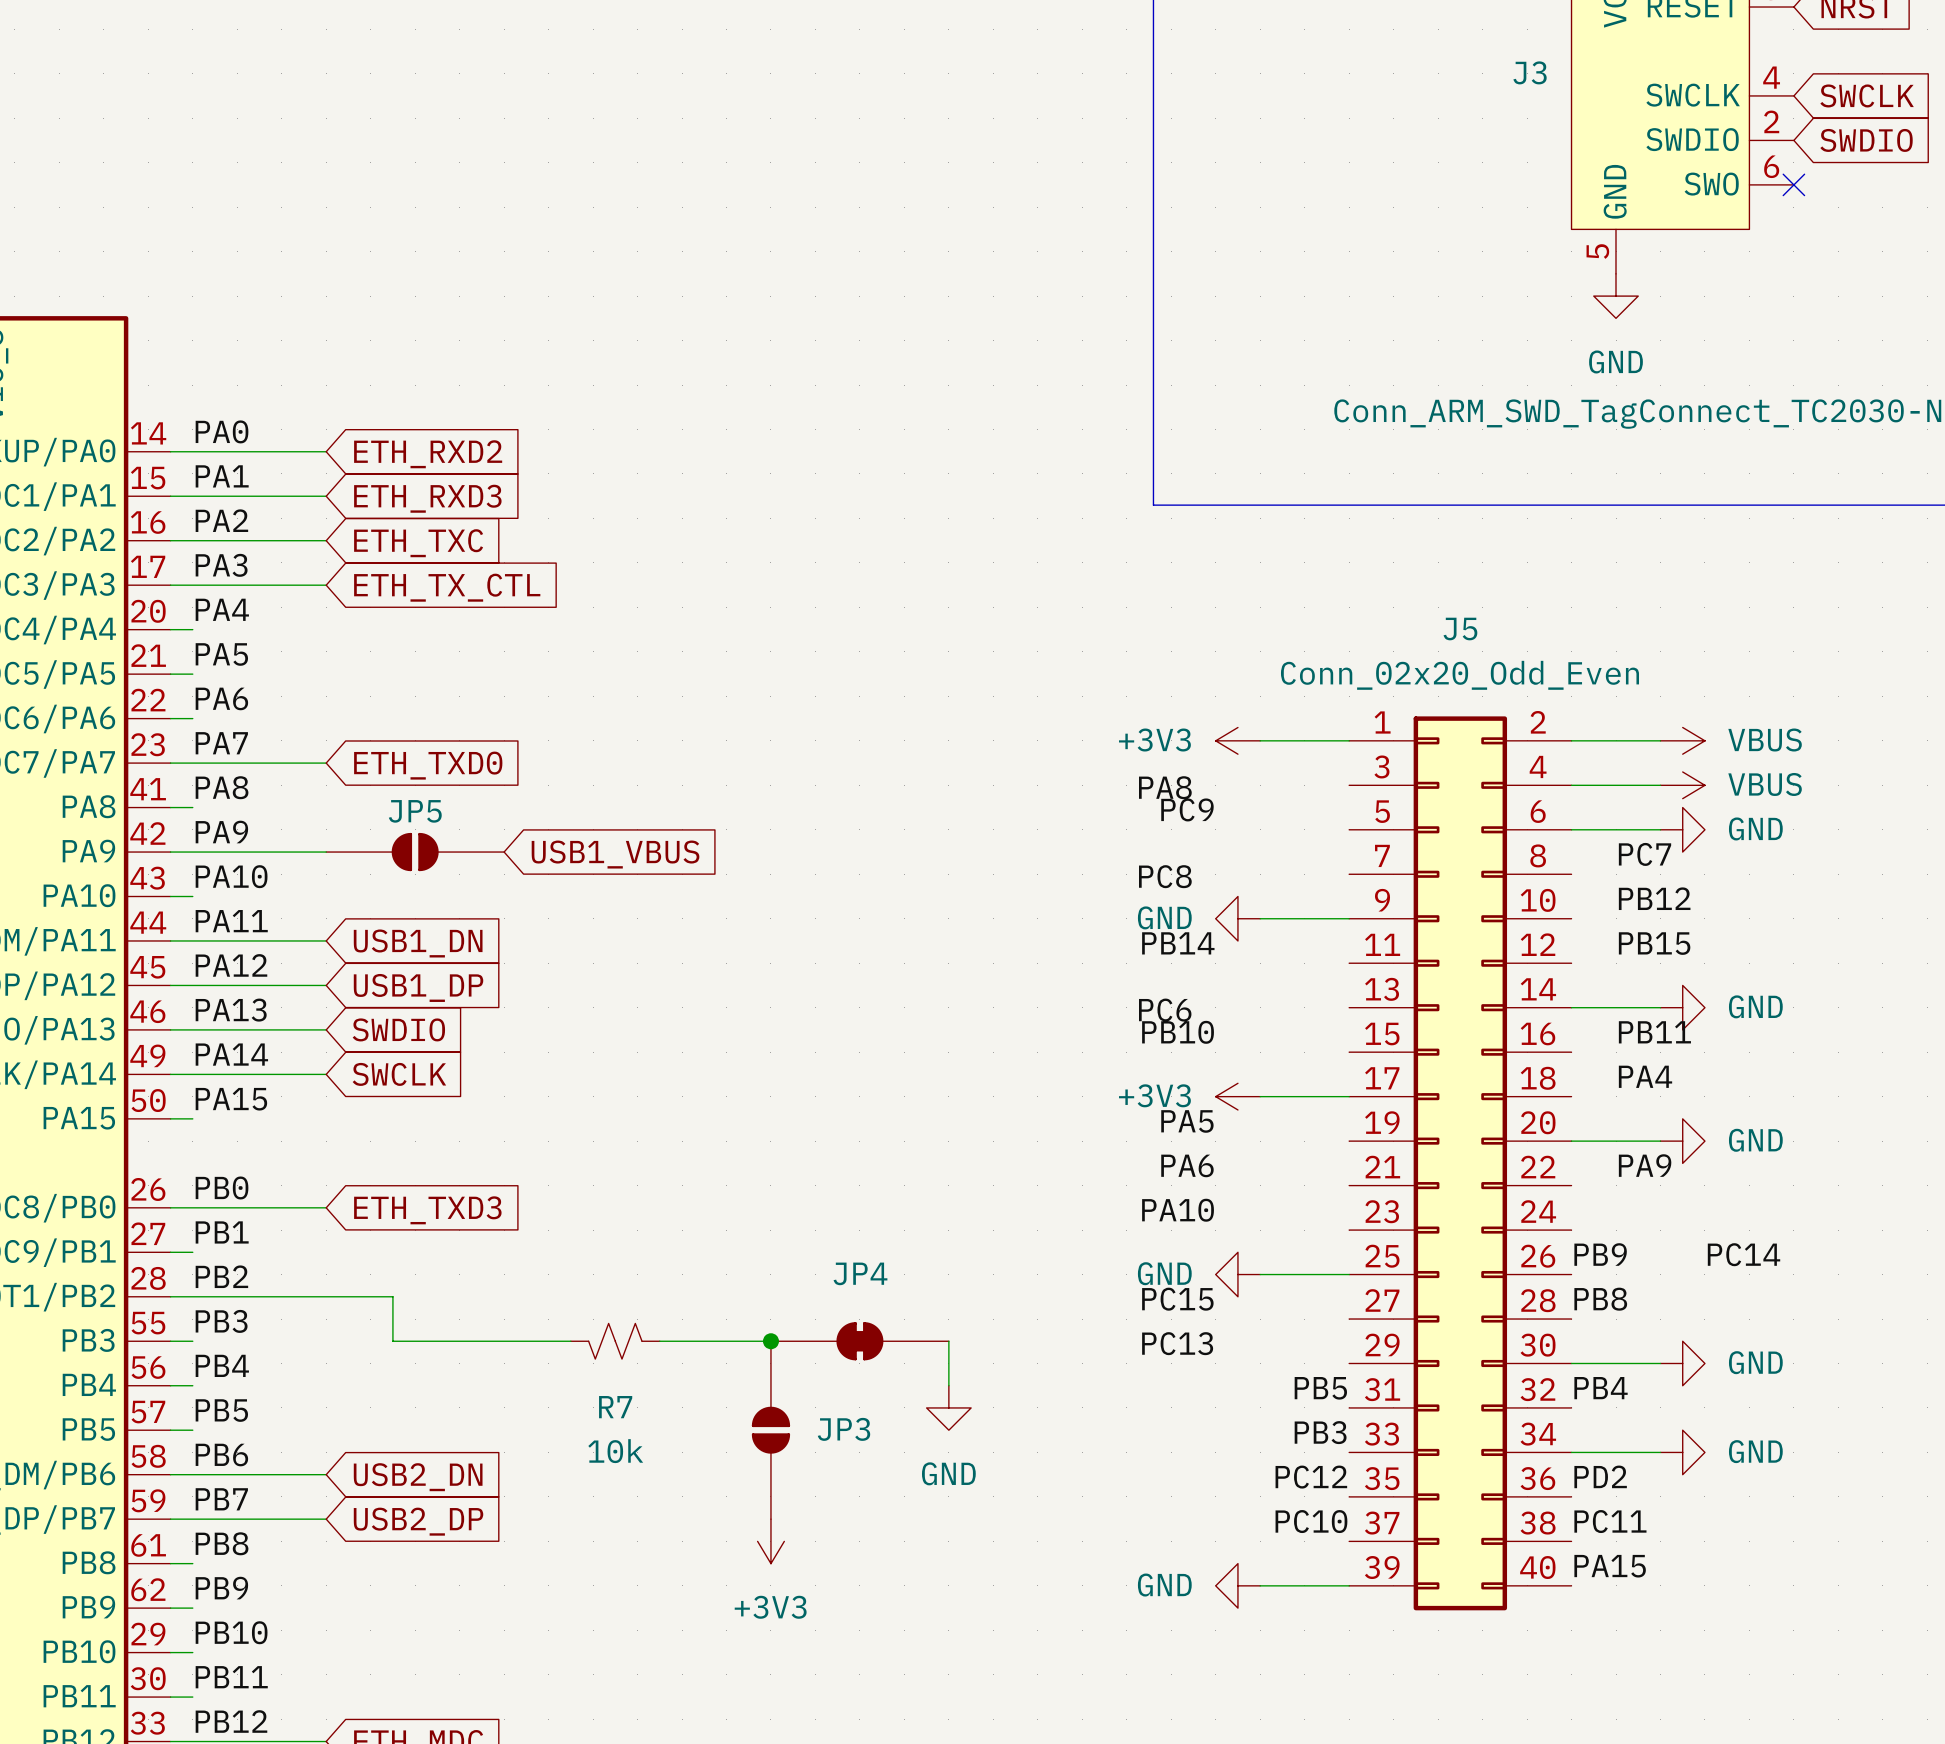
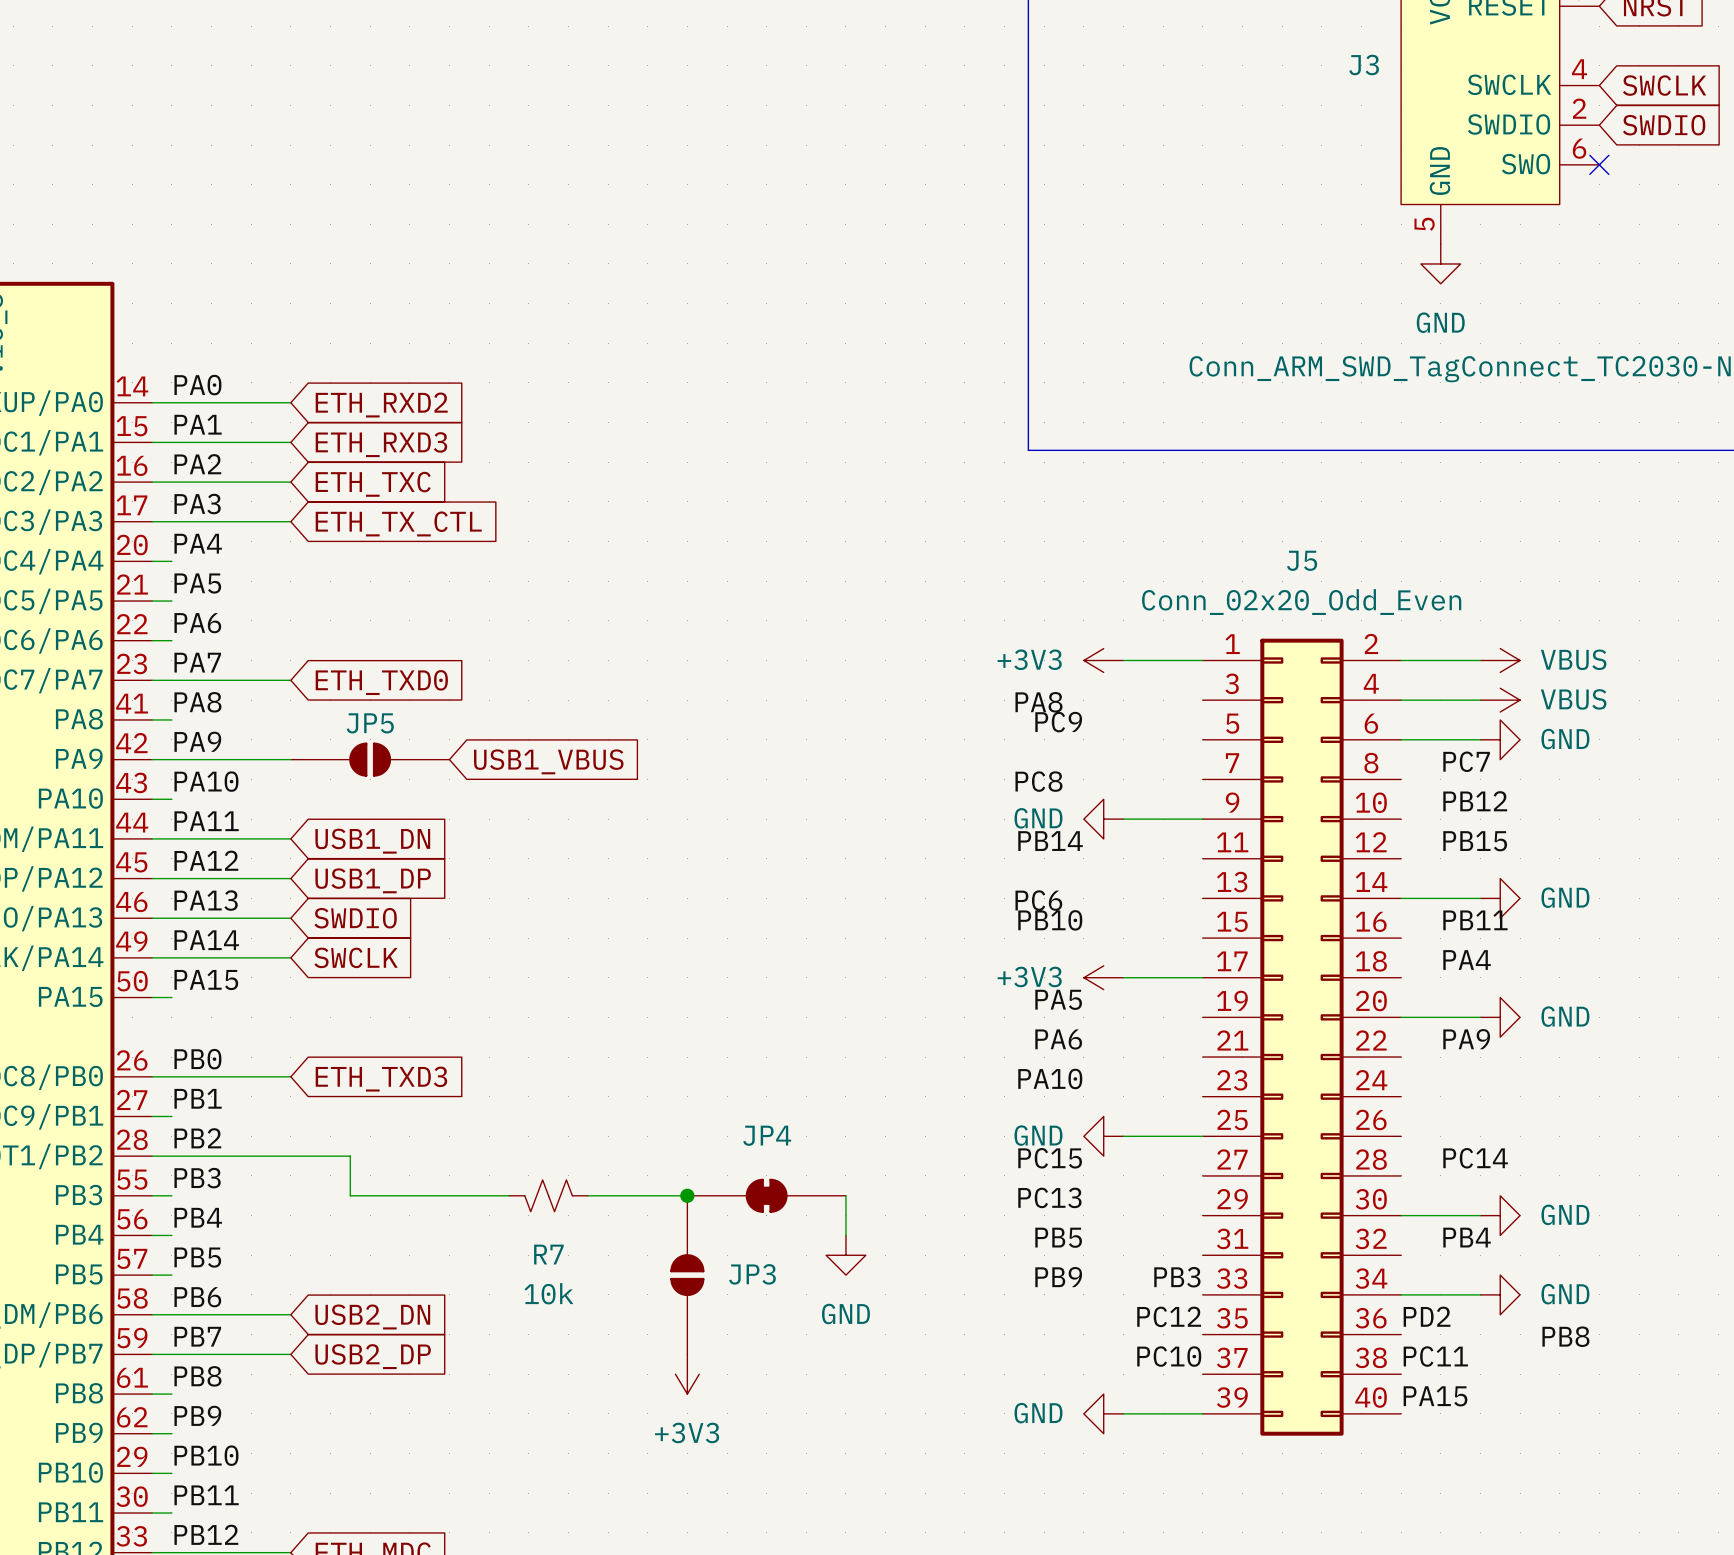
label position: PB9 (1600, 1254) -> PB9 (1058, 1277)
label position: PC14 (1744, 1254) -> PC14 (1475, 1158)
label position: PB8 (1600, 1299) -> PB8 (1565, 1336)
label position: PB5 (1320, 1388) -> PB5 (1058, 1237)
label position: PB4 (1601, 1388) -> PB4 (1467, 1237)

